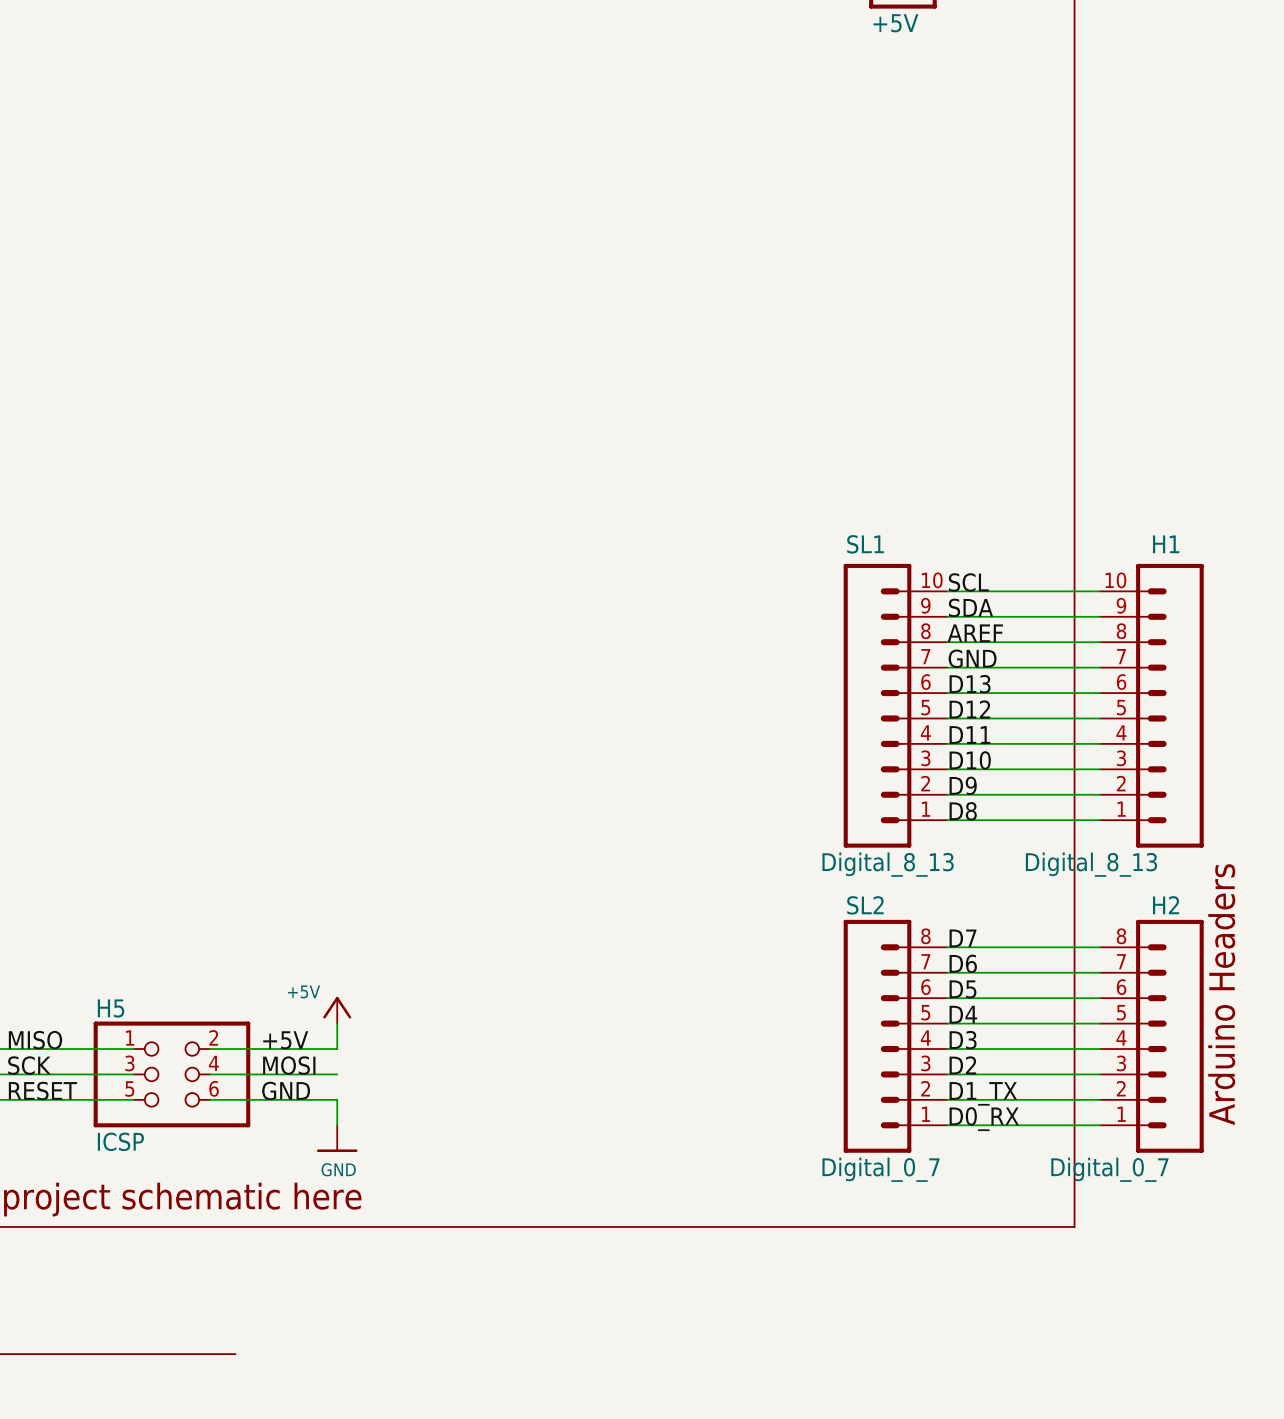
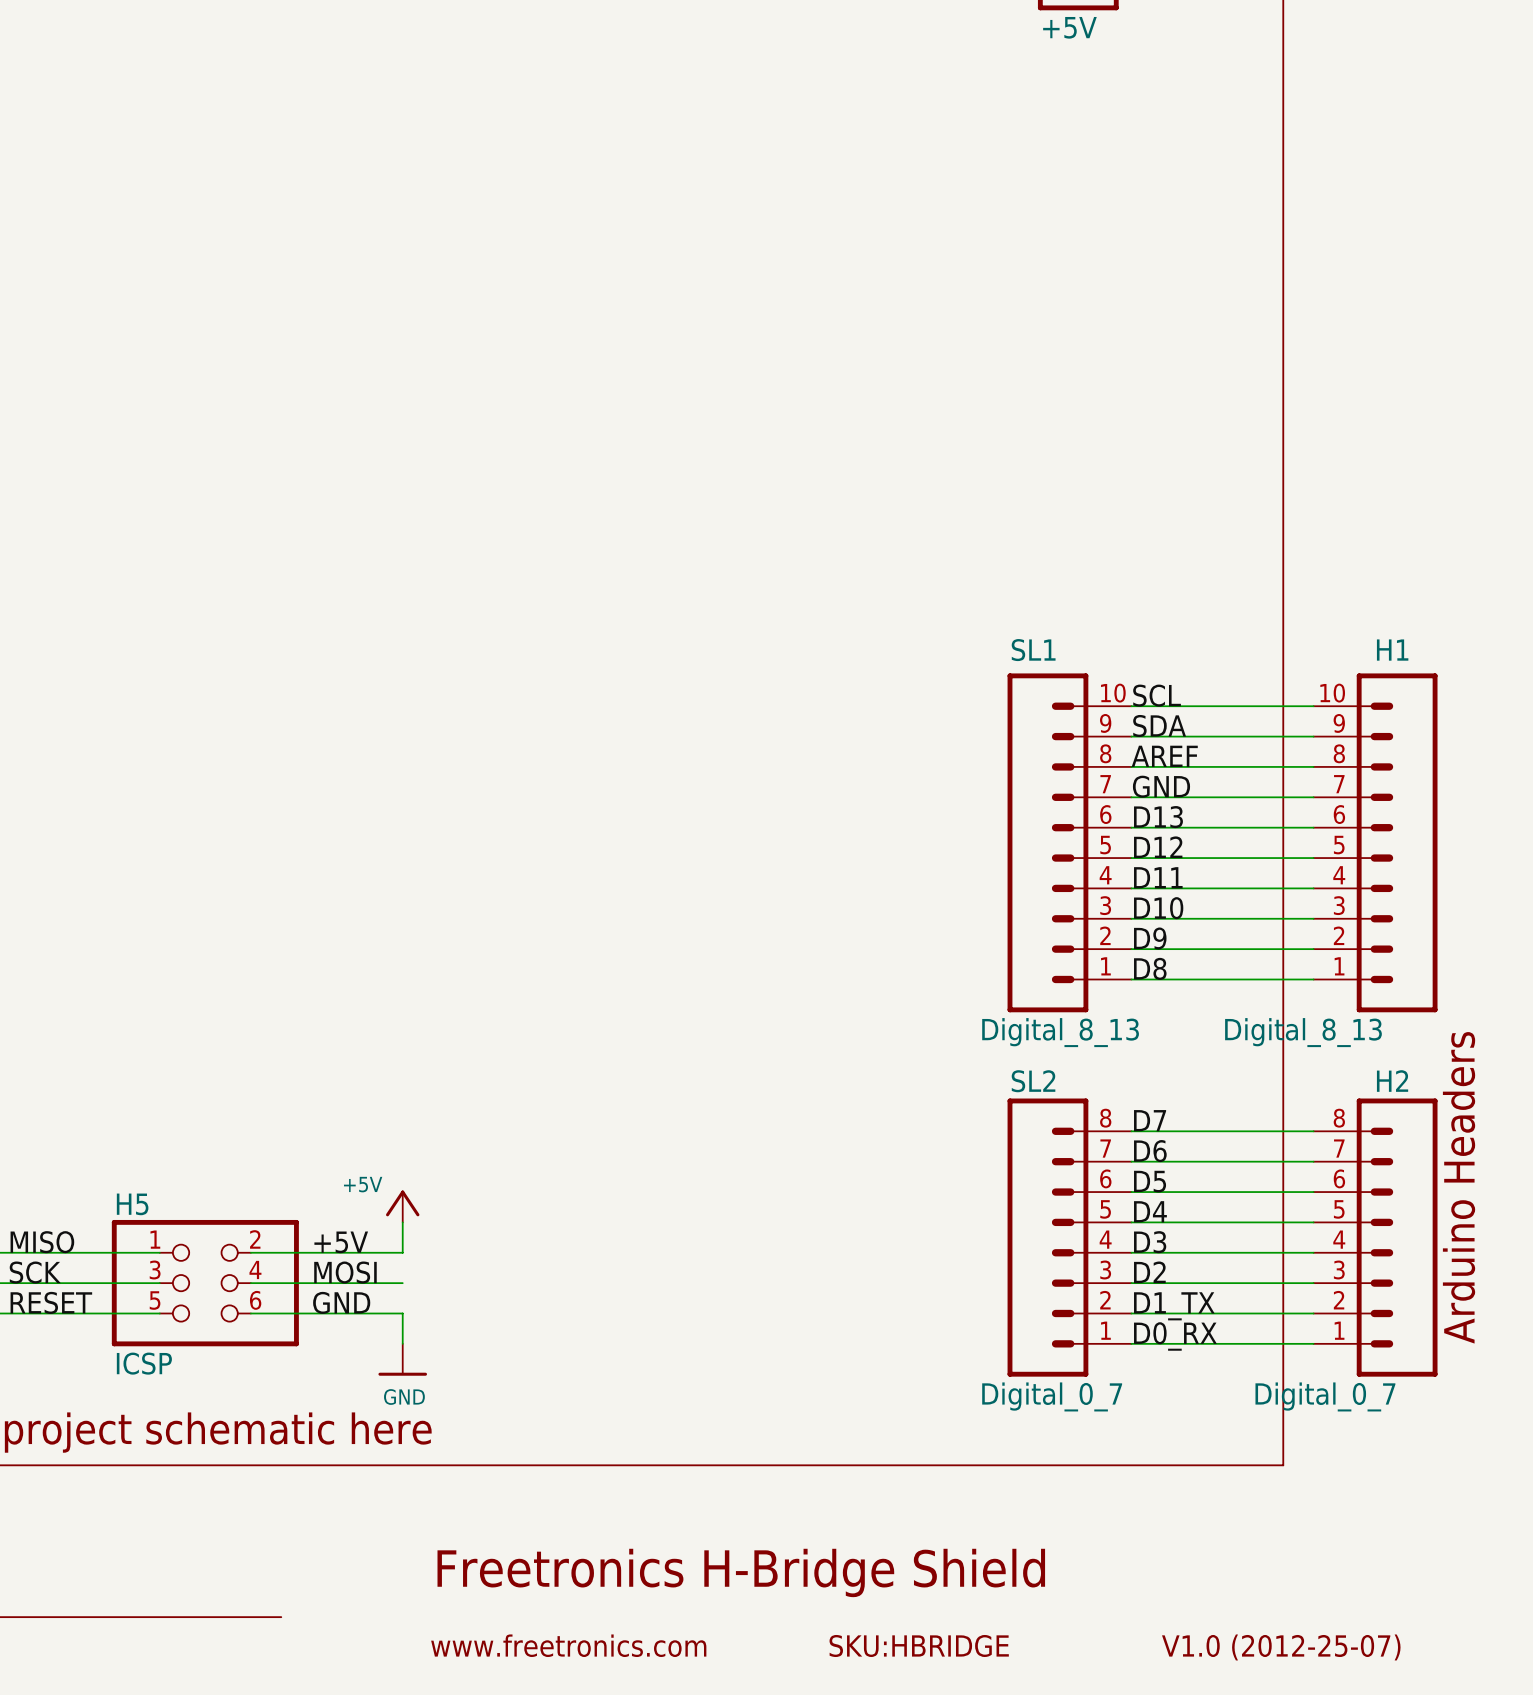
text: none -> Freetronics H-Bridge Shield (741, 1572)
text: none -> www.freetronics.com (568, 1645)
text: none -> SKU:HBRIDGE (919, 1645)
text: none -> V1.0 (2012-25-07) (1281, 1647)

